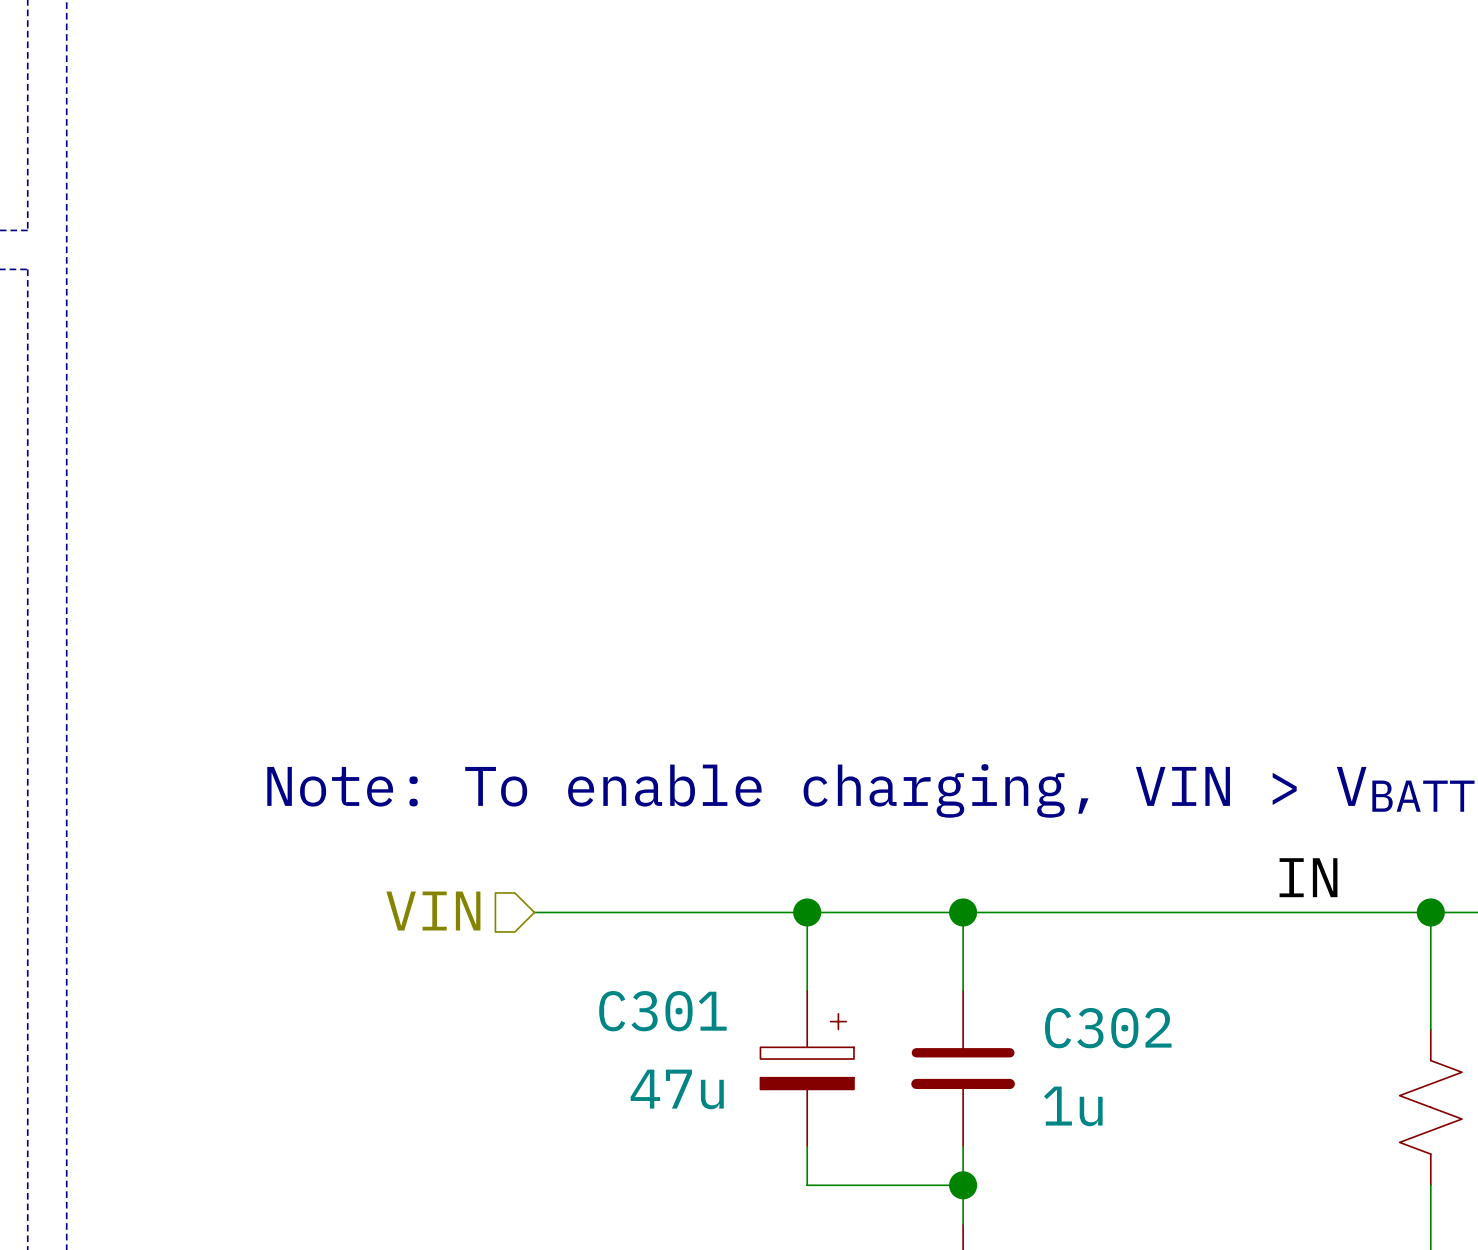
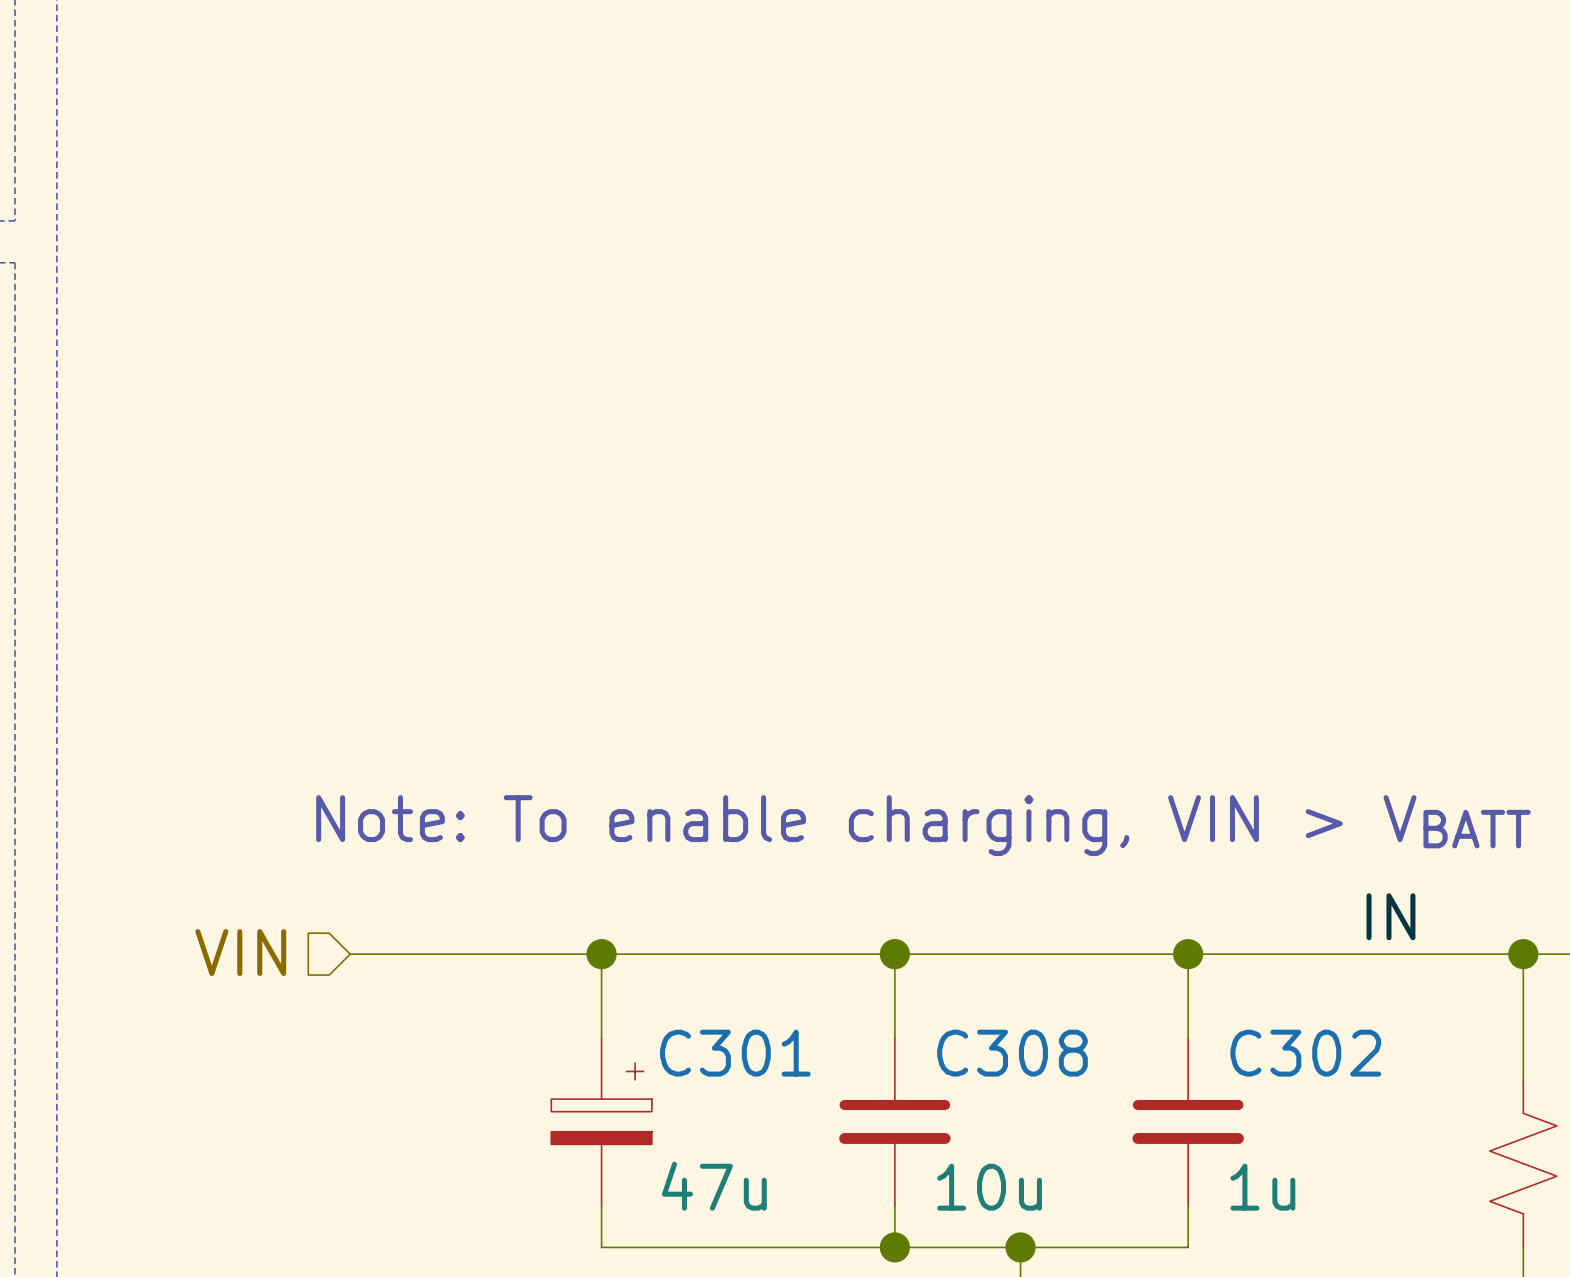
hierarchical label position: VIN (433, 911) -> VIN (240, 952)
wire: none -> (350, 954) (559, 954)
wire: none -> (601, 954) (601, 1037)
junction: none -> (601, 954)
wire: (807, 912) (807, 990) -> (894, 954) (894, 1037)
junction position: (807, 912) -> (894, 954)
wire: (963, 912) (963, 990) -> (1188, 954) (1188, 1037)
junction: (963, 912) -> none
junction: none -> (1188, 954)
C301 name position: C301 (662, 1011) -> C301 (735, 1053)
C302 name position: C302 (1108, 1028) -> C302 (1305, 1053)
C301 position: (807, 1068) -> (601, 1121)
C308: none -> 10u (894, 1121)
C302 position: (963, 1068) -> (1188, 1121)
C301 value position: 47u (677, 1089) -> 47u (714, 1186)
C302 value position: 1u (1073, 1106) -> 1u (1262, 1187)
wire: (807, 1146) (807, 1185) -> (601, 1205) (601, 1247) (852, 1247)
wire: none -> (894, 1205) (894, 1247)
wire: (963, 1146) (963, 1185) -> (1188, 1205) (1188, 1247) (1020, 1247)
junction: none -> (894, 1247)

